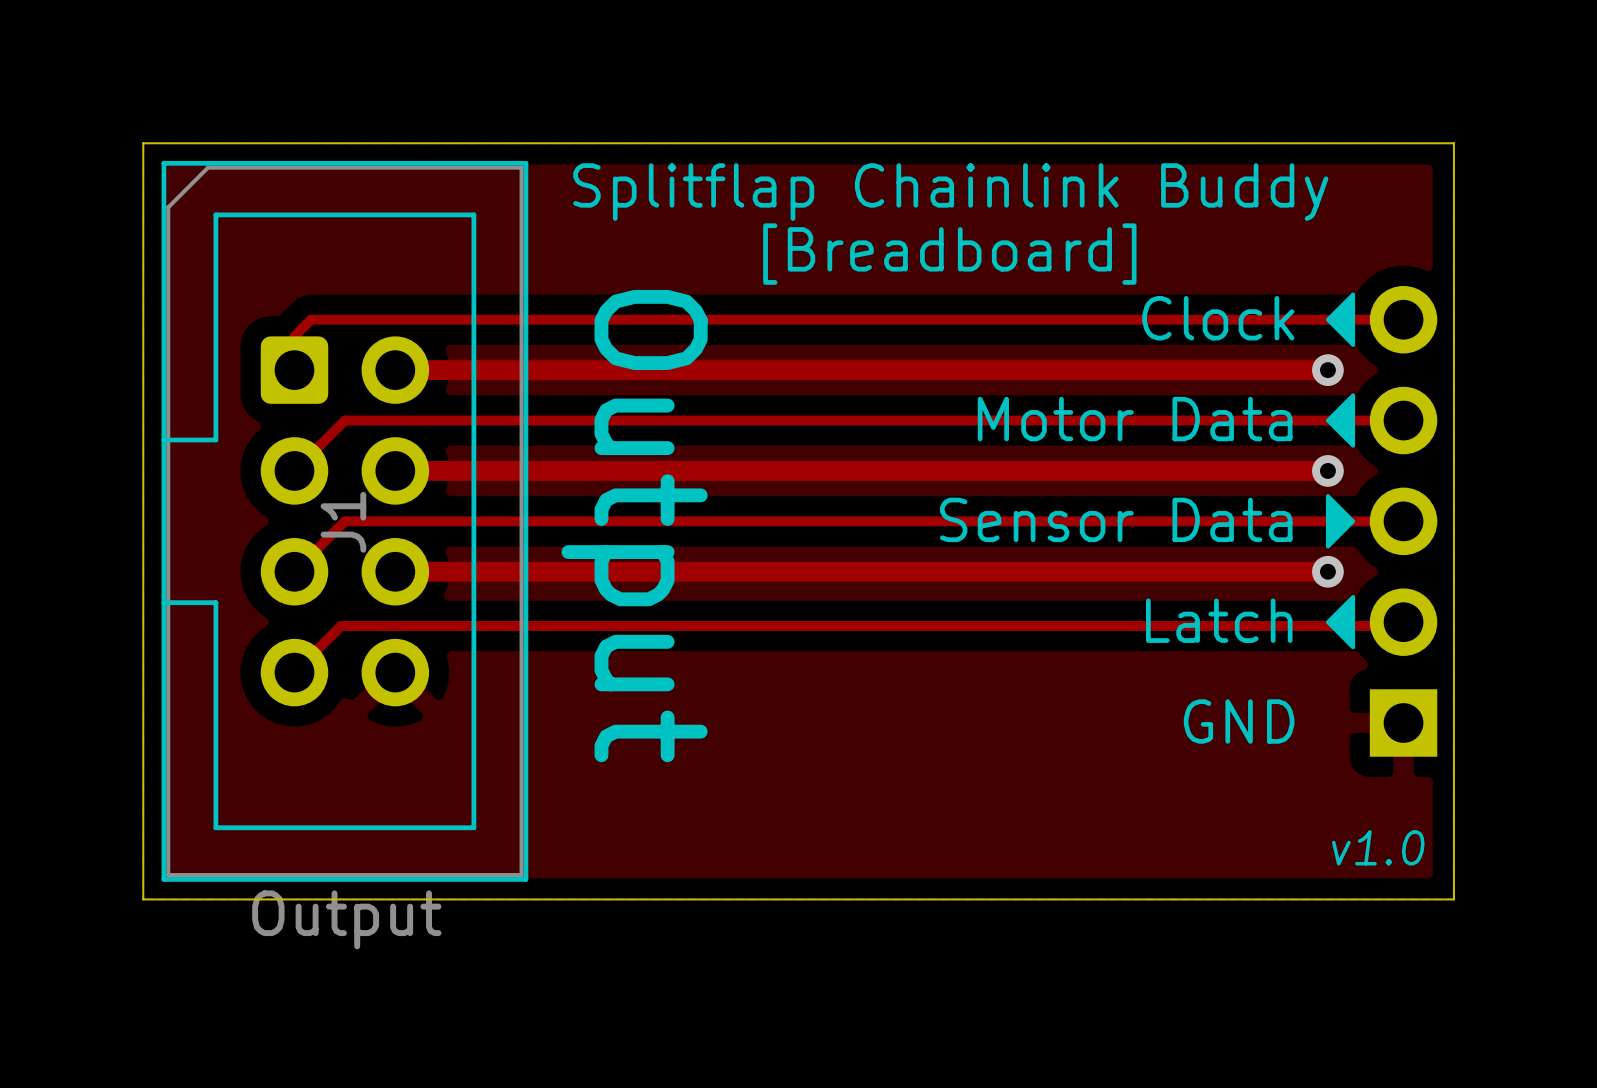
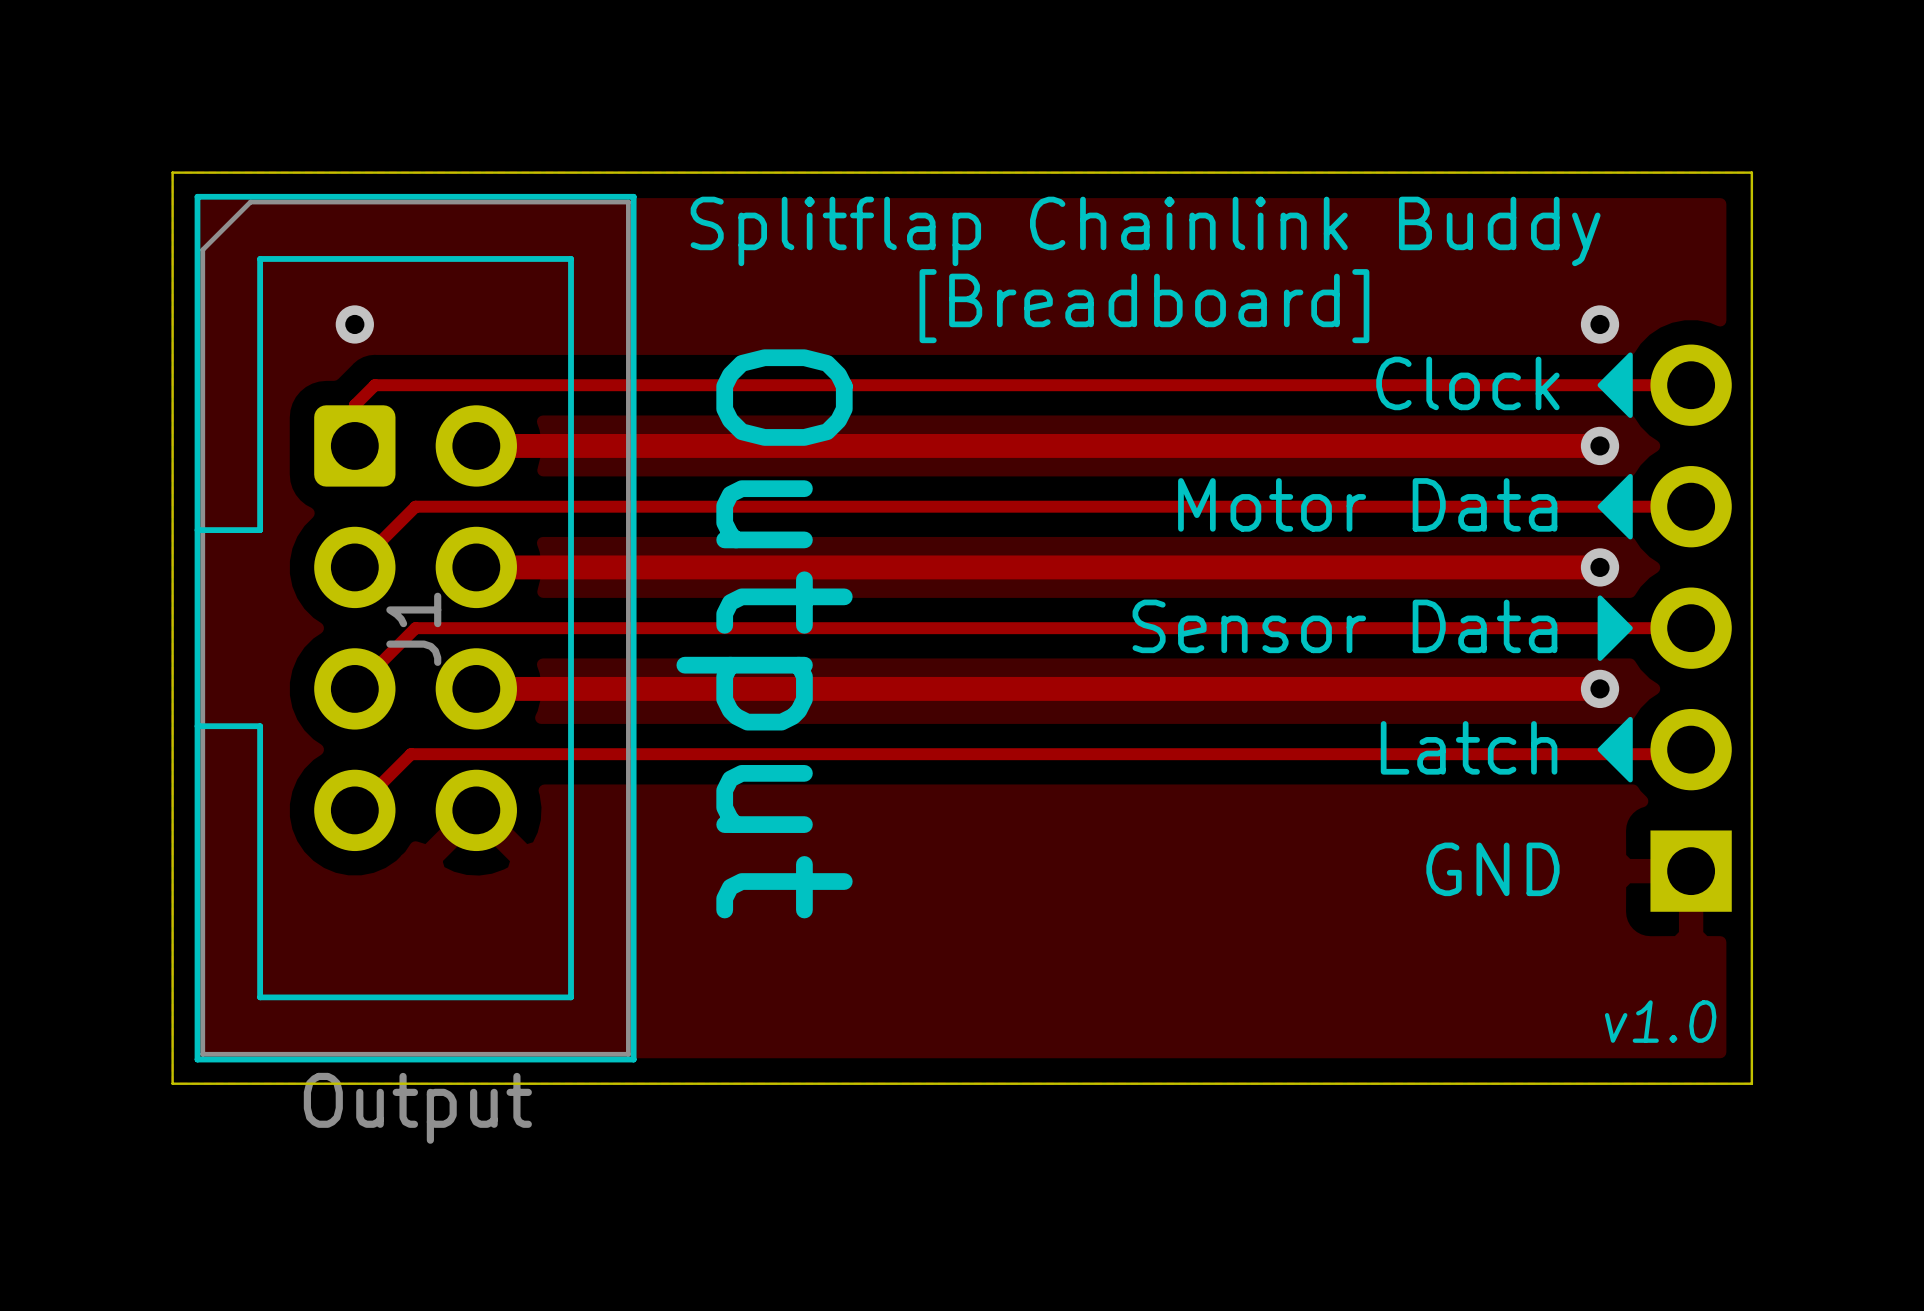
via: none -> (354, 324)
via: none -> (1600, 324)

